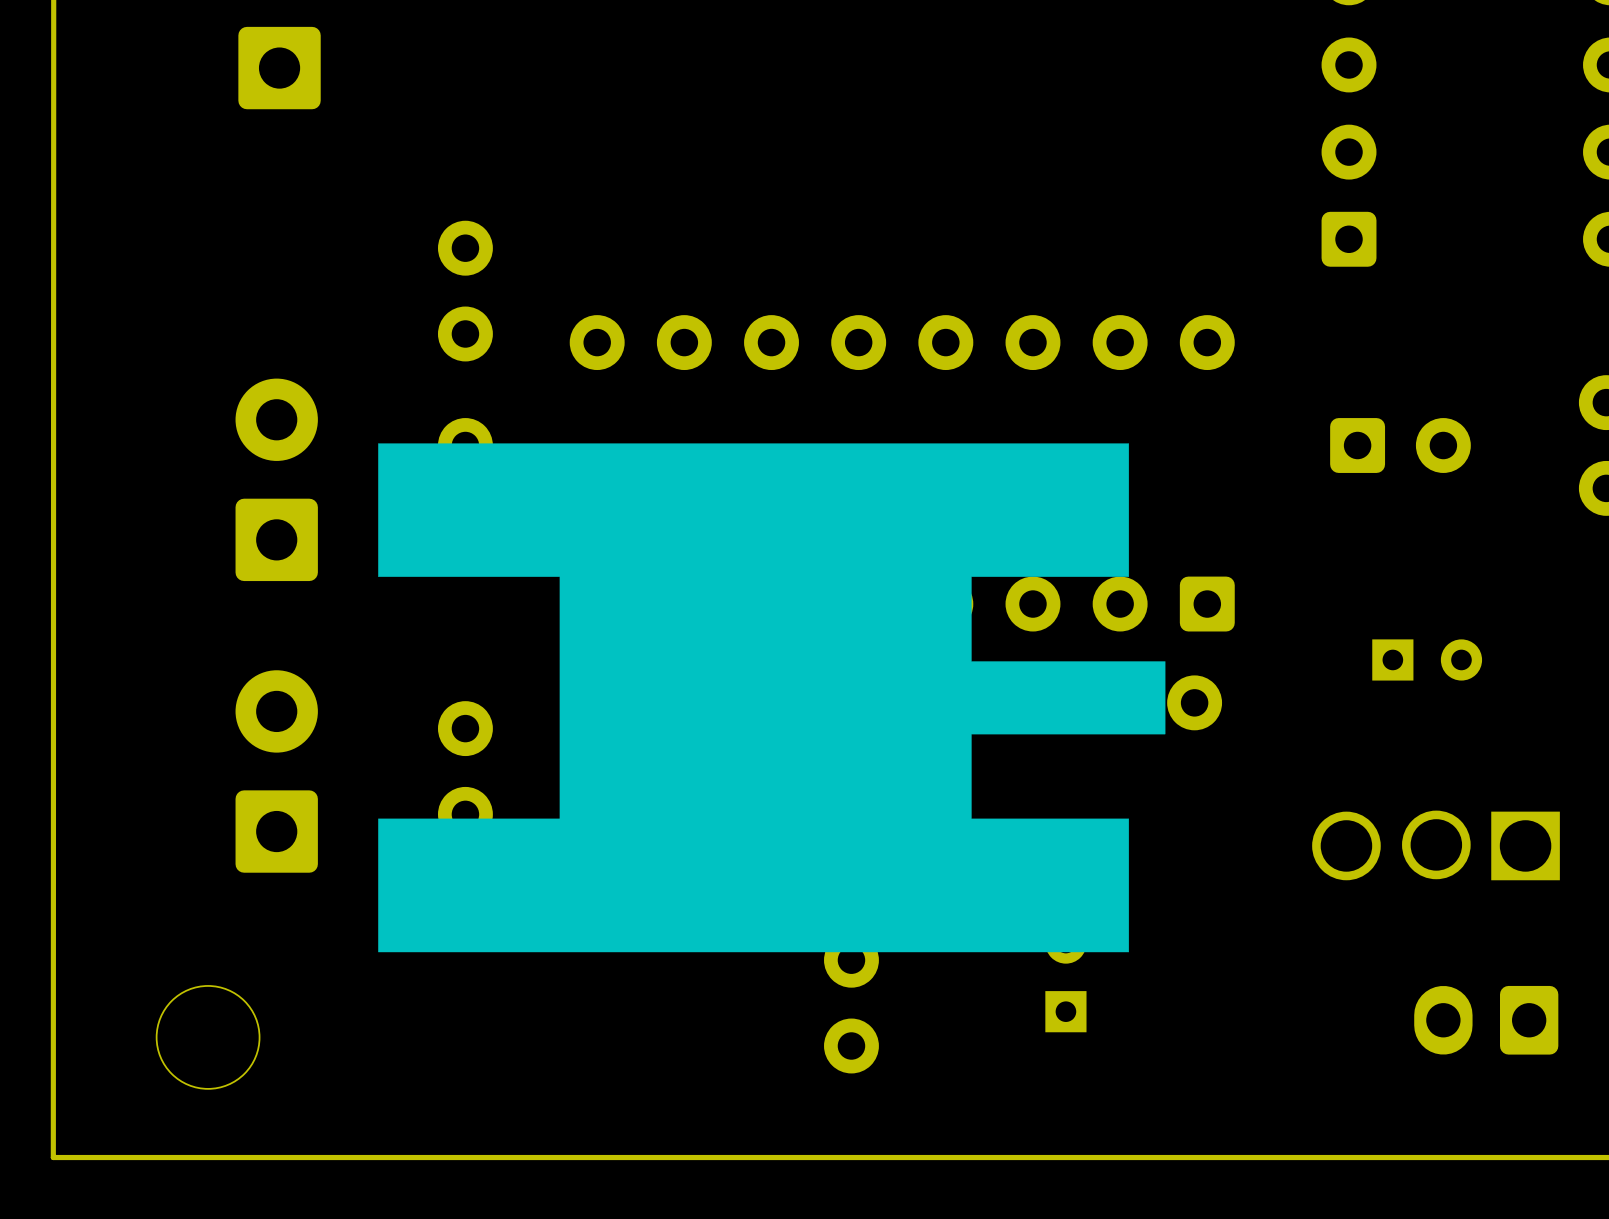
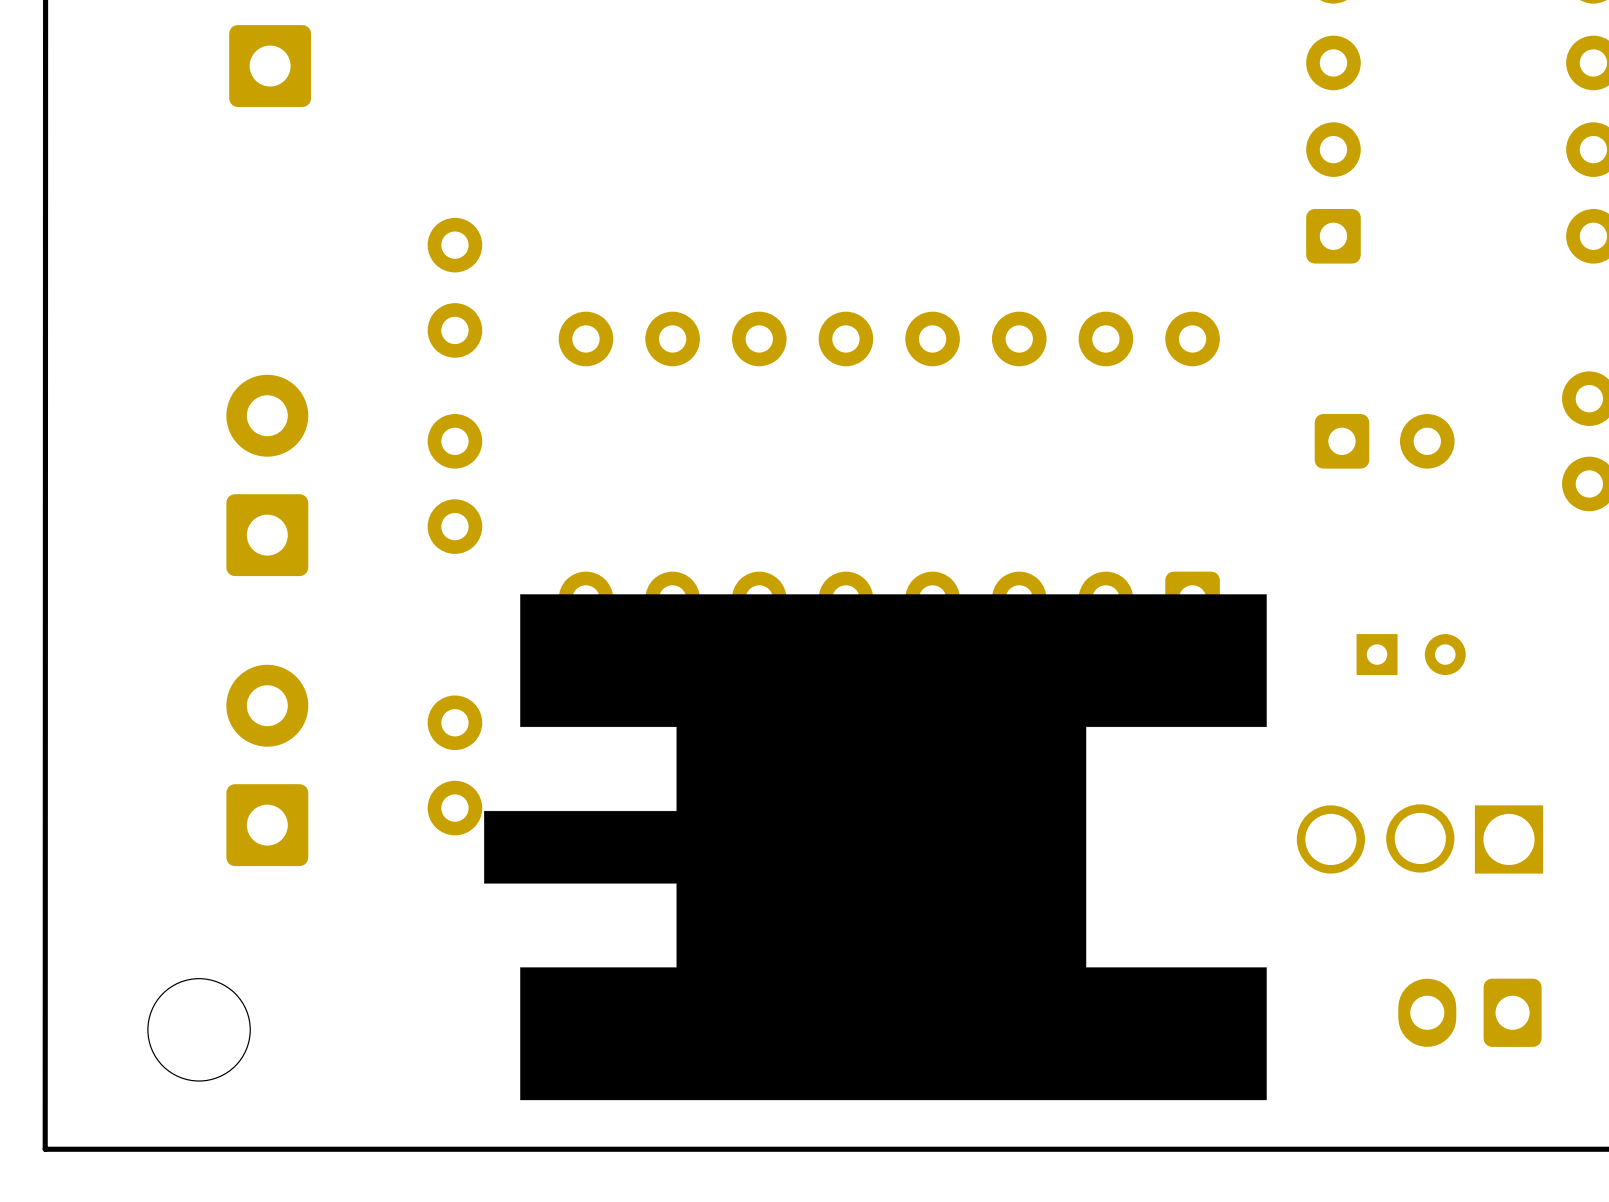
drawing: [378, 443, 1166, 953] -> none
drawing: none -> [484, 594, 1267, 1101]

